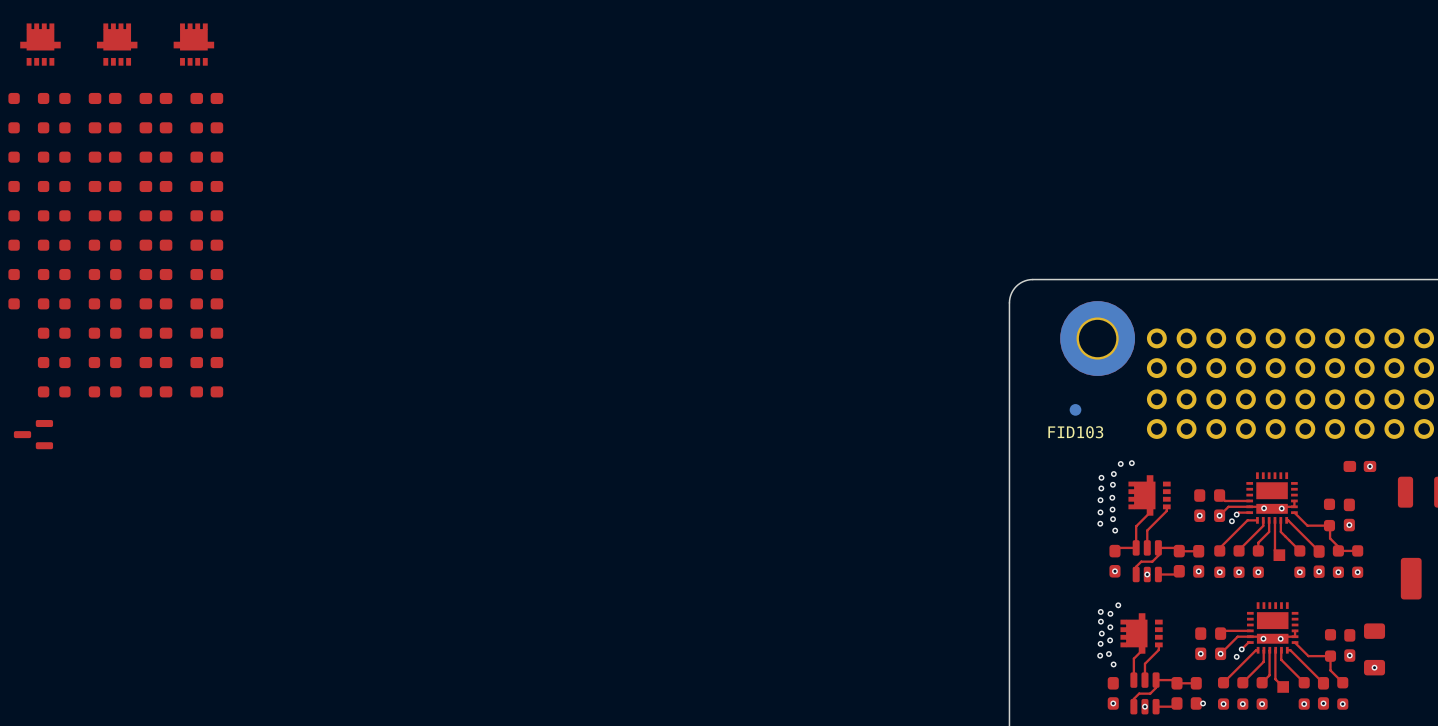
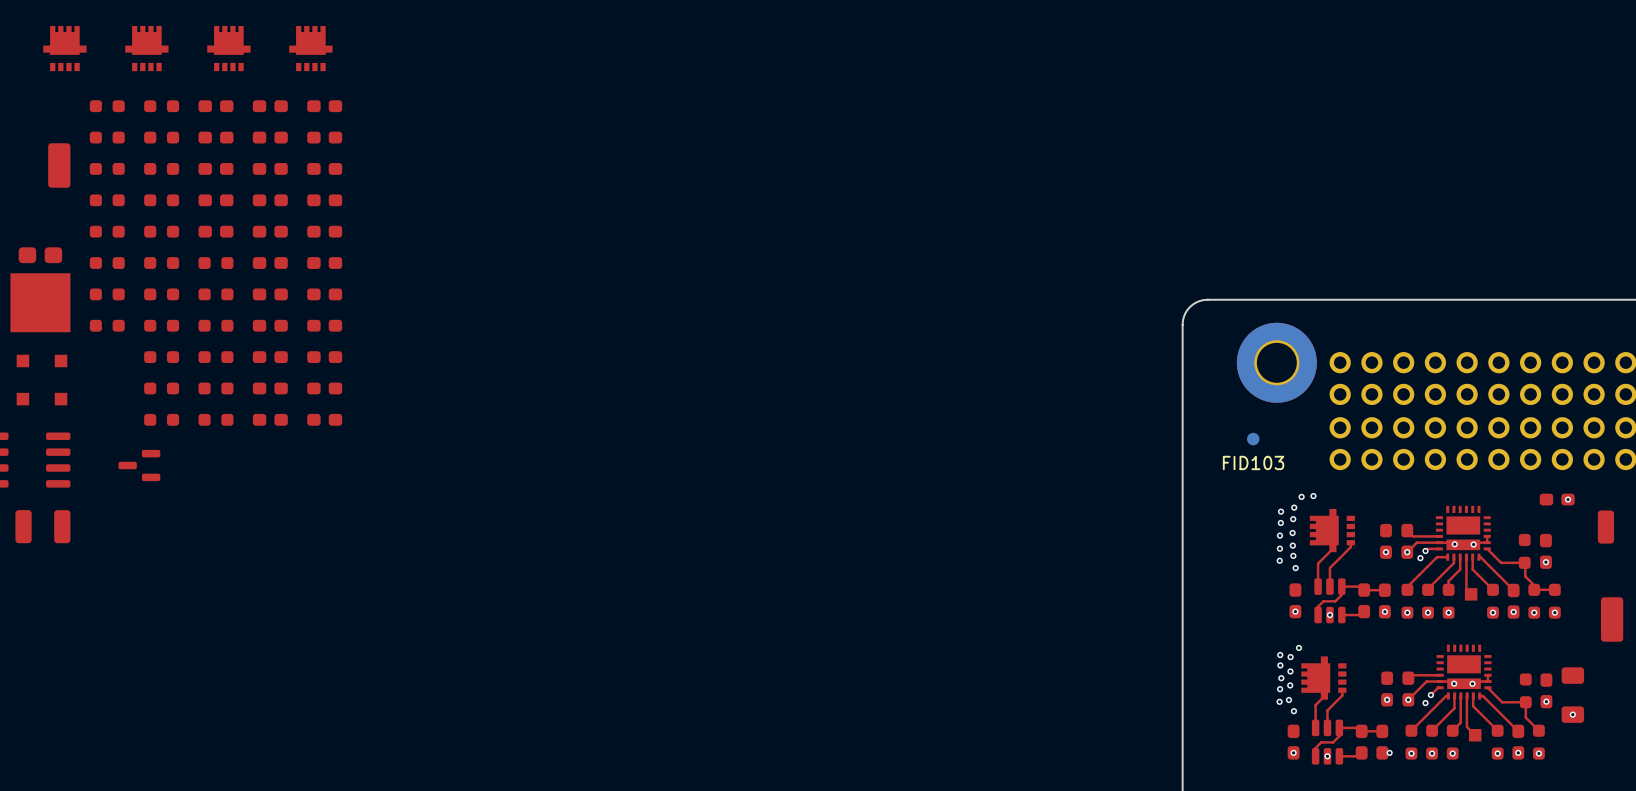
top track: (1136, 547) (1118, 547) (1114, 551) -> none

